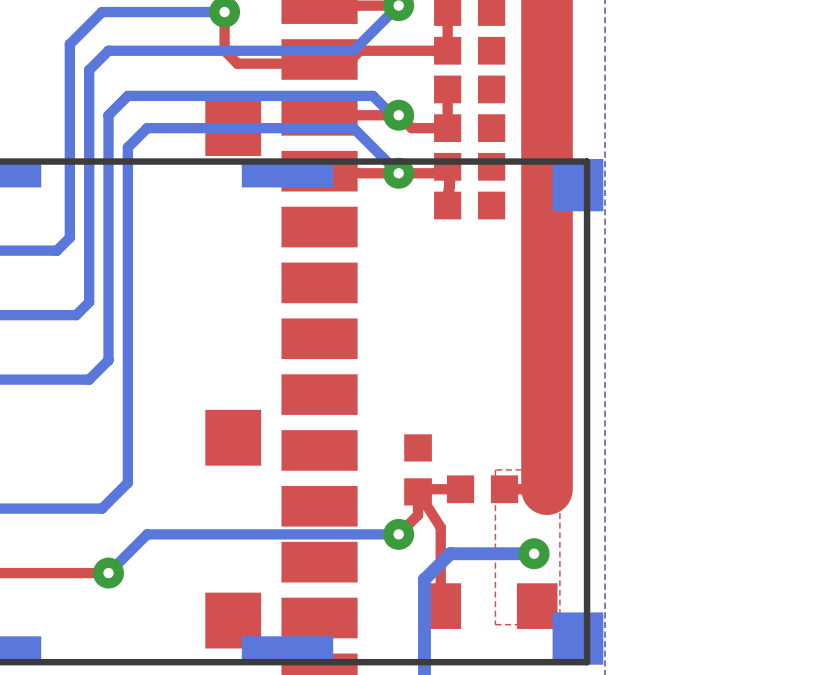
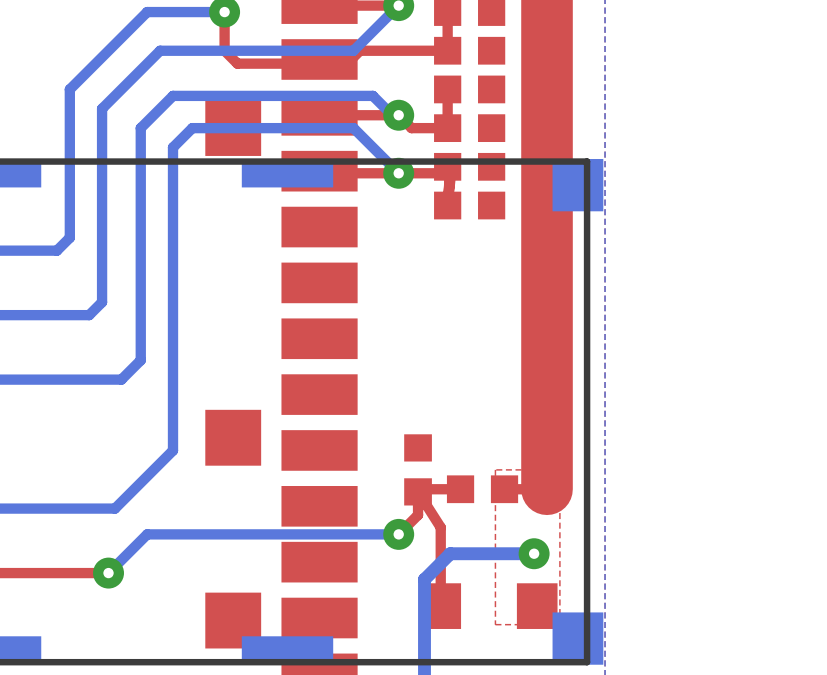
bottom track: (147, 12) (102, 12) (69, 44) (69, 89) -> (89, 70) (69, 89)
bottom track: (160, 50) (108, 50) -> (147, 12) (108, 50)
bottom track: (89, 70) (89, 302) (76, 315) -> (160, 50) (102, 108) (102, 302) (89, 315) (76, 315)
bottom track: (173, 95) (127, 95) (108, 115) (108, 360) (89, 379) -> (173, 95) (140, 128) (140, 360) (121, 379) (89, 379)
bottom track: (192, 128) (147, 128) (127, 147) (127, 482) (102, 508) -> (192, 128) (173, 147) (173, 450) (114, 508) (102, 508)

